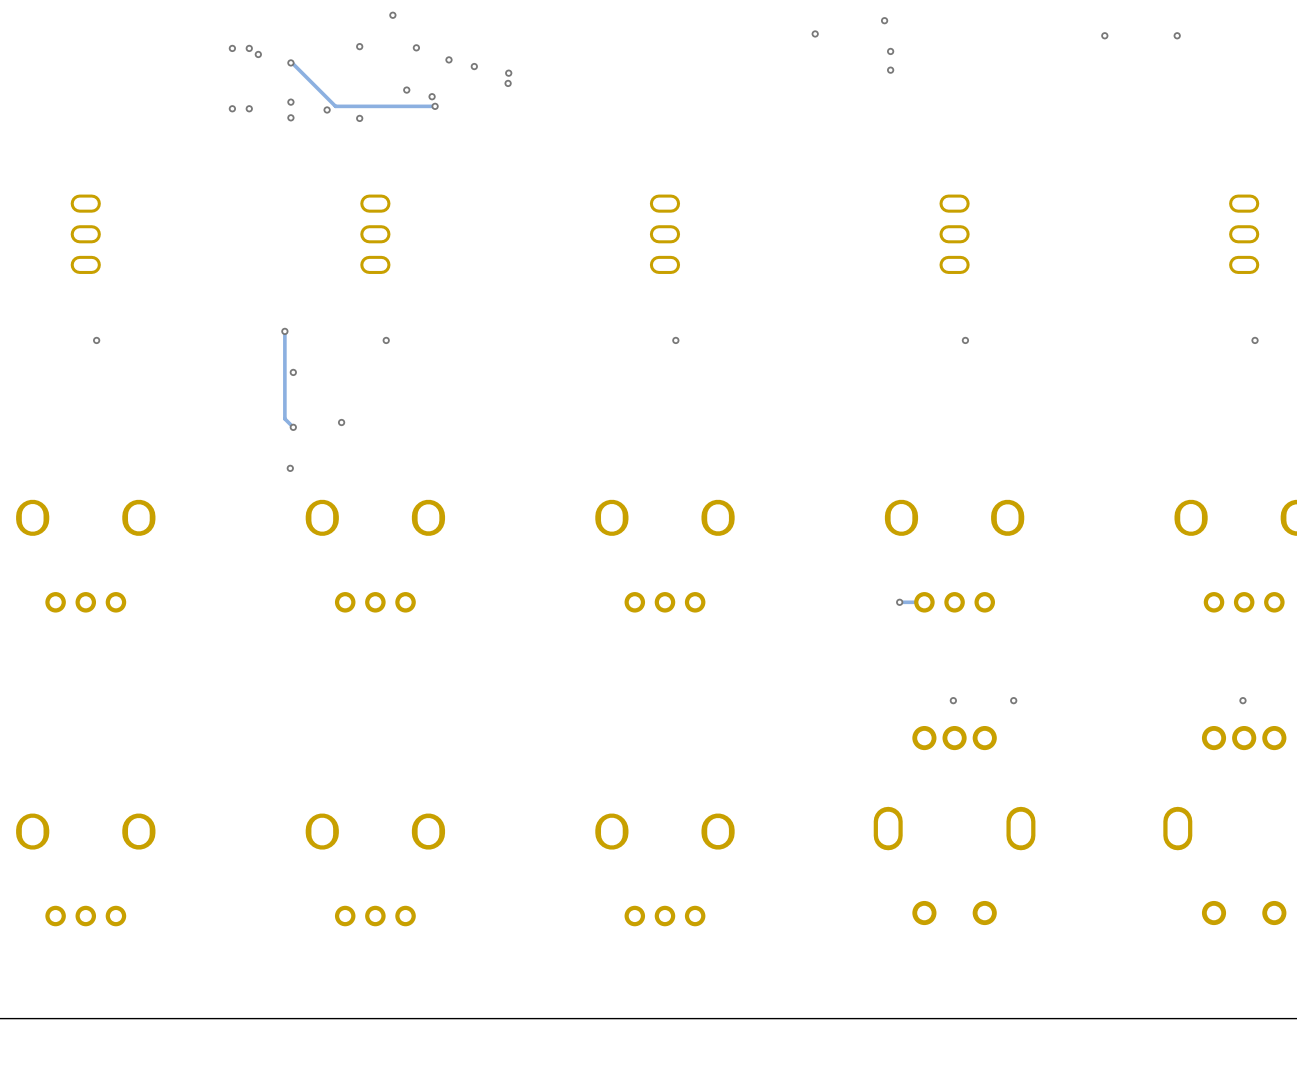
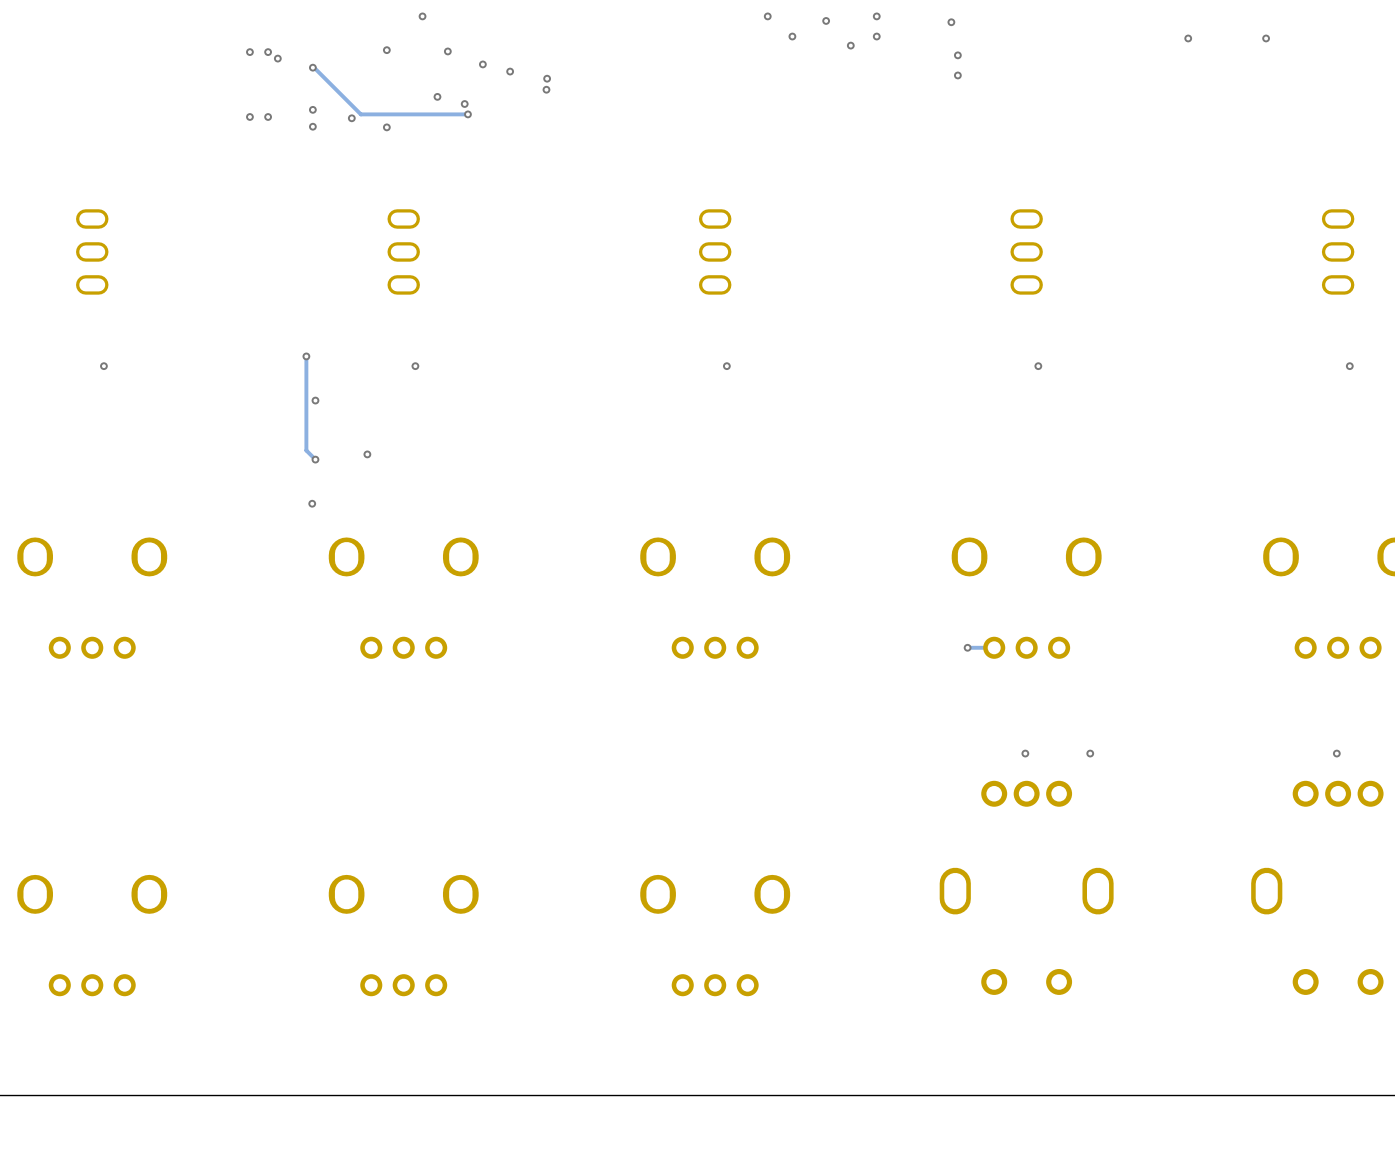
via: none -> (767, 16)
via: none -> (876, 16)
via: none -> (826, 20)
via: none -> (792, 36)
via: none -> (850, 45)

